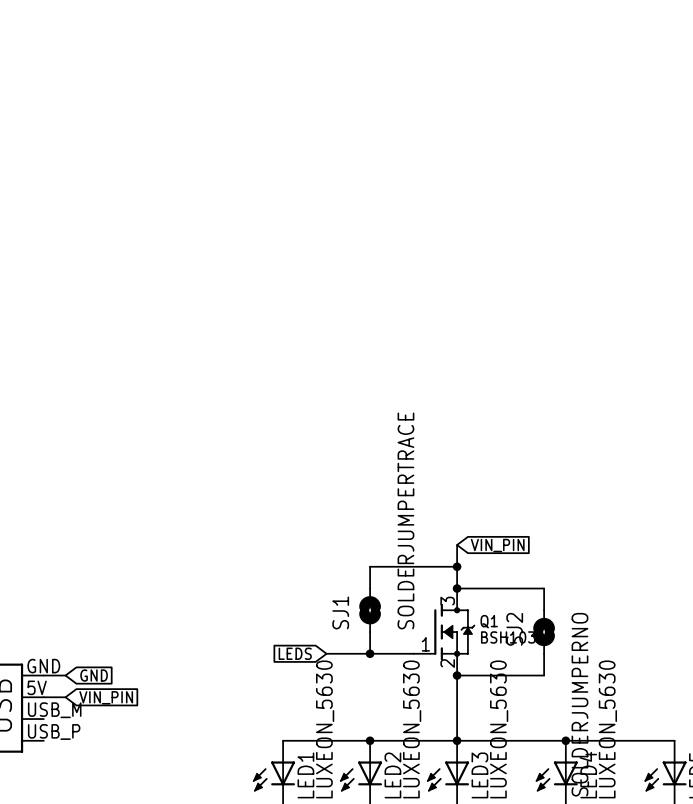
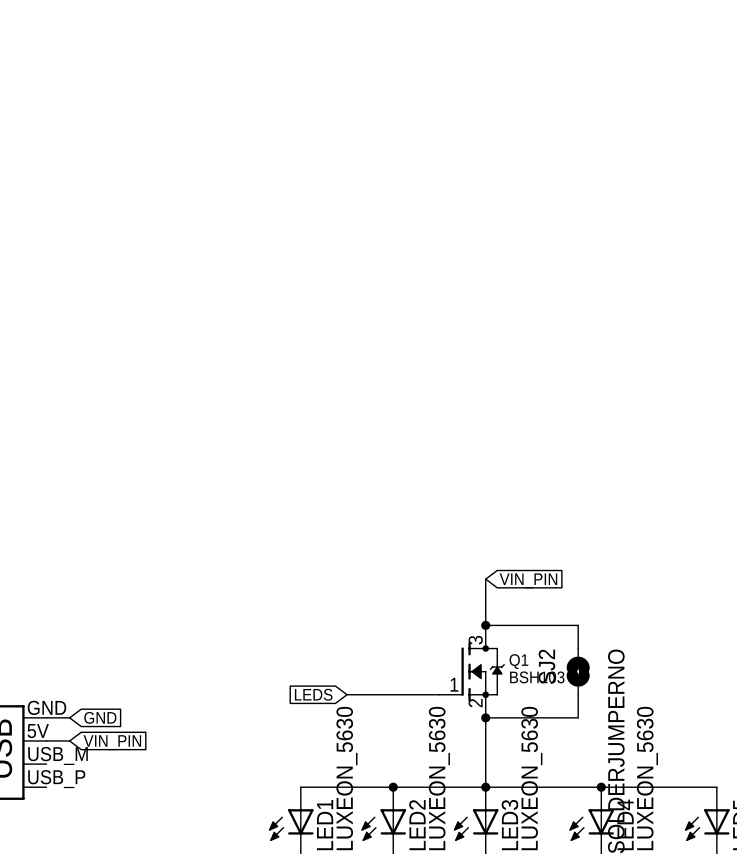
wire: (370, 566) (457, 566) -> none
junction: (457, 566) -> none
SJ1: SOLDERJUMPERTRACE (370, 610) -> none
junction: (370, 653) -> none

